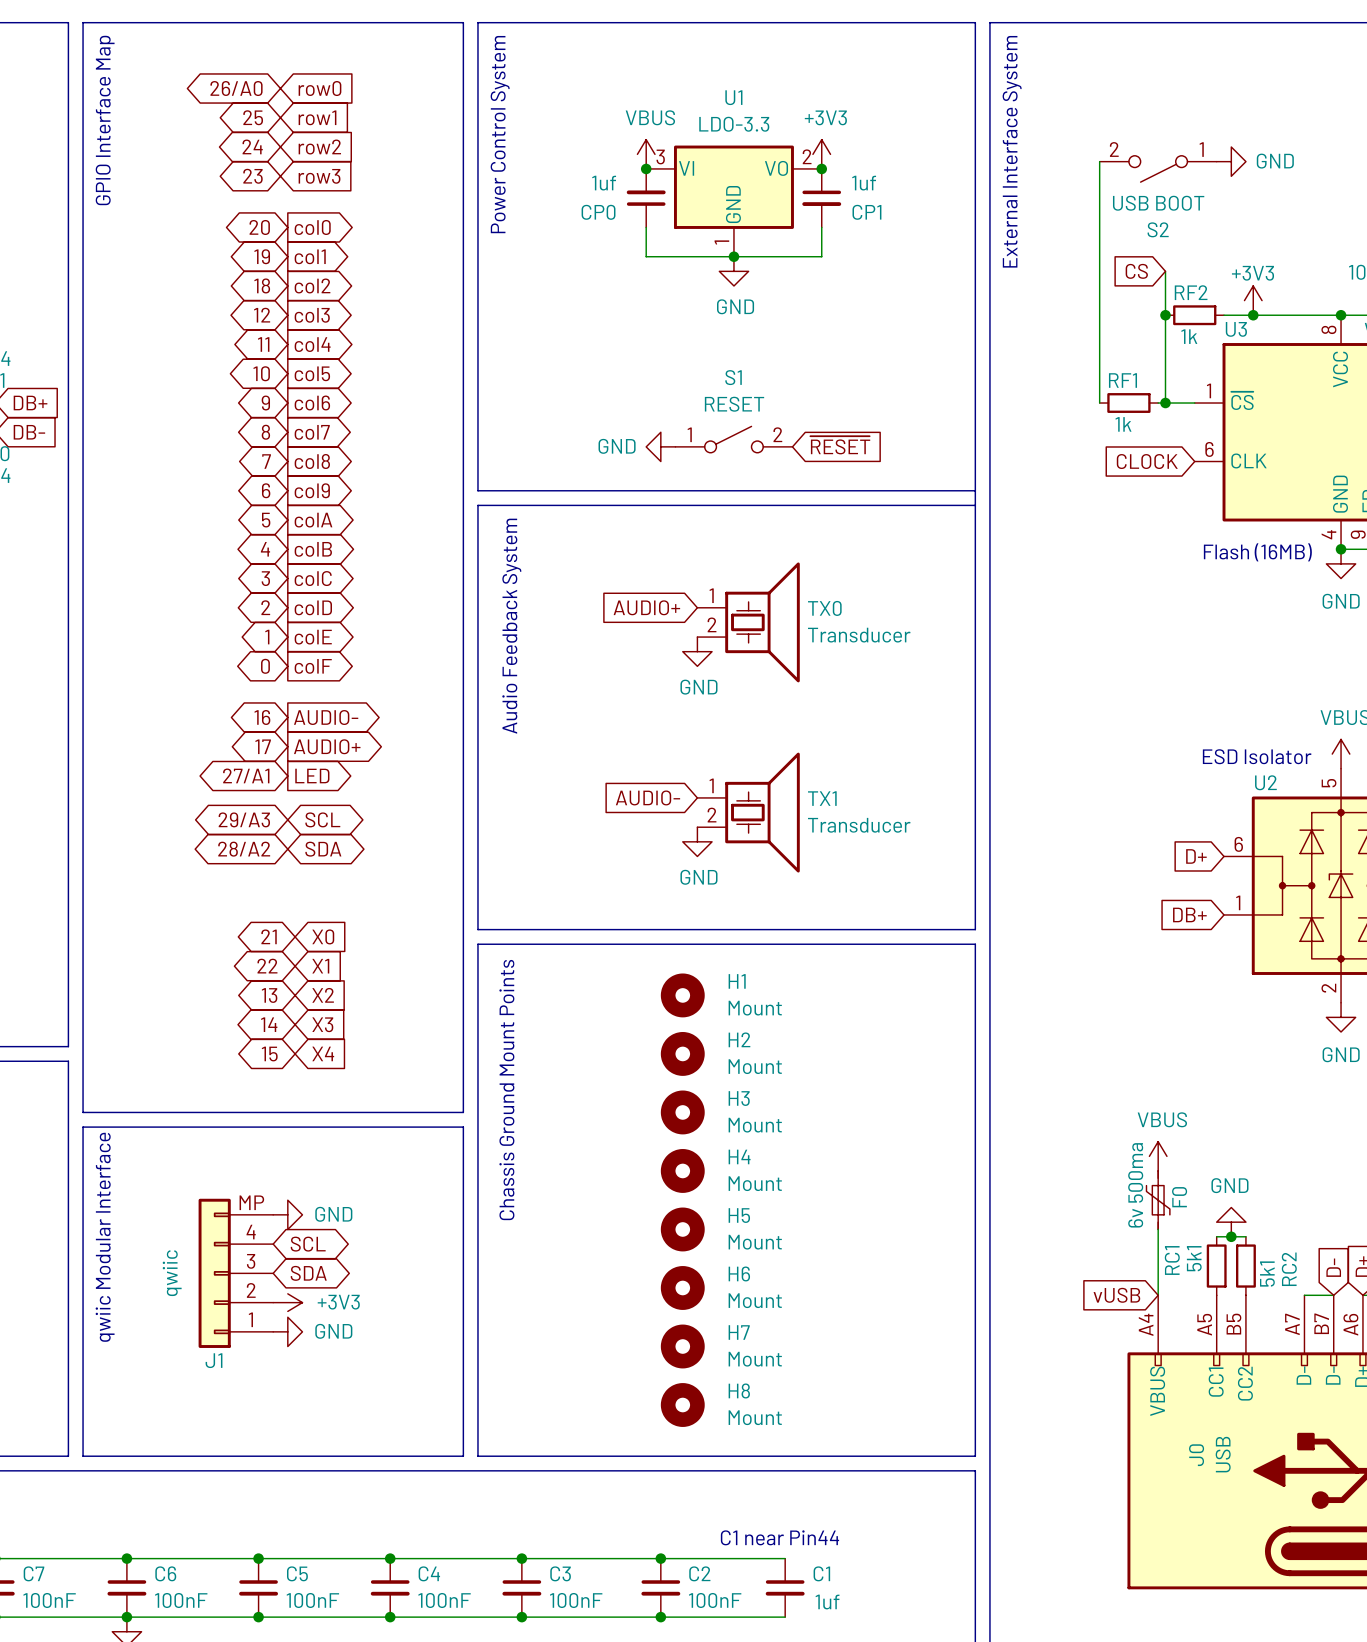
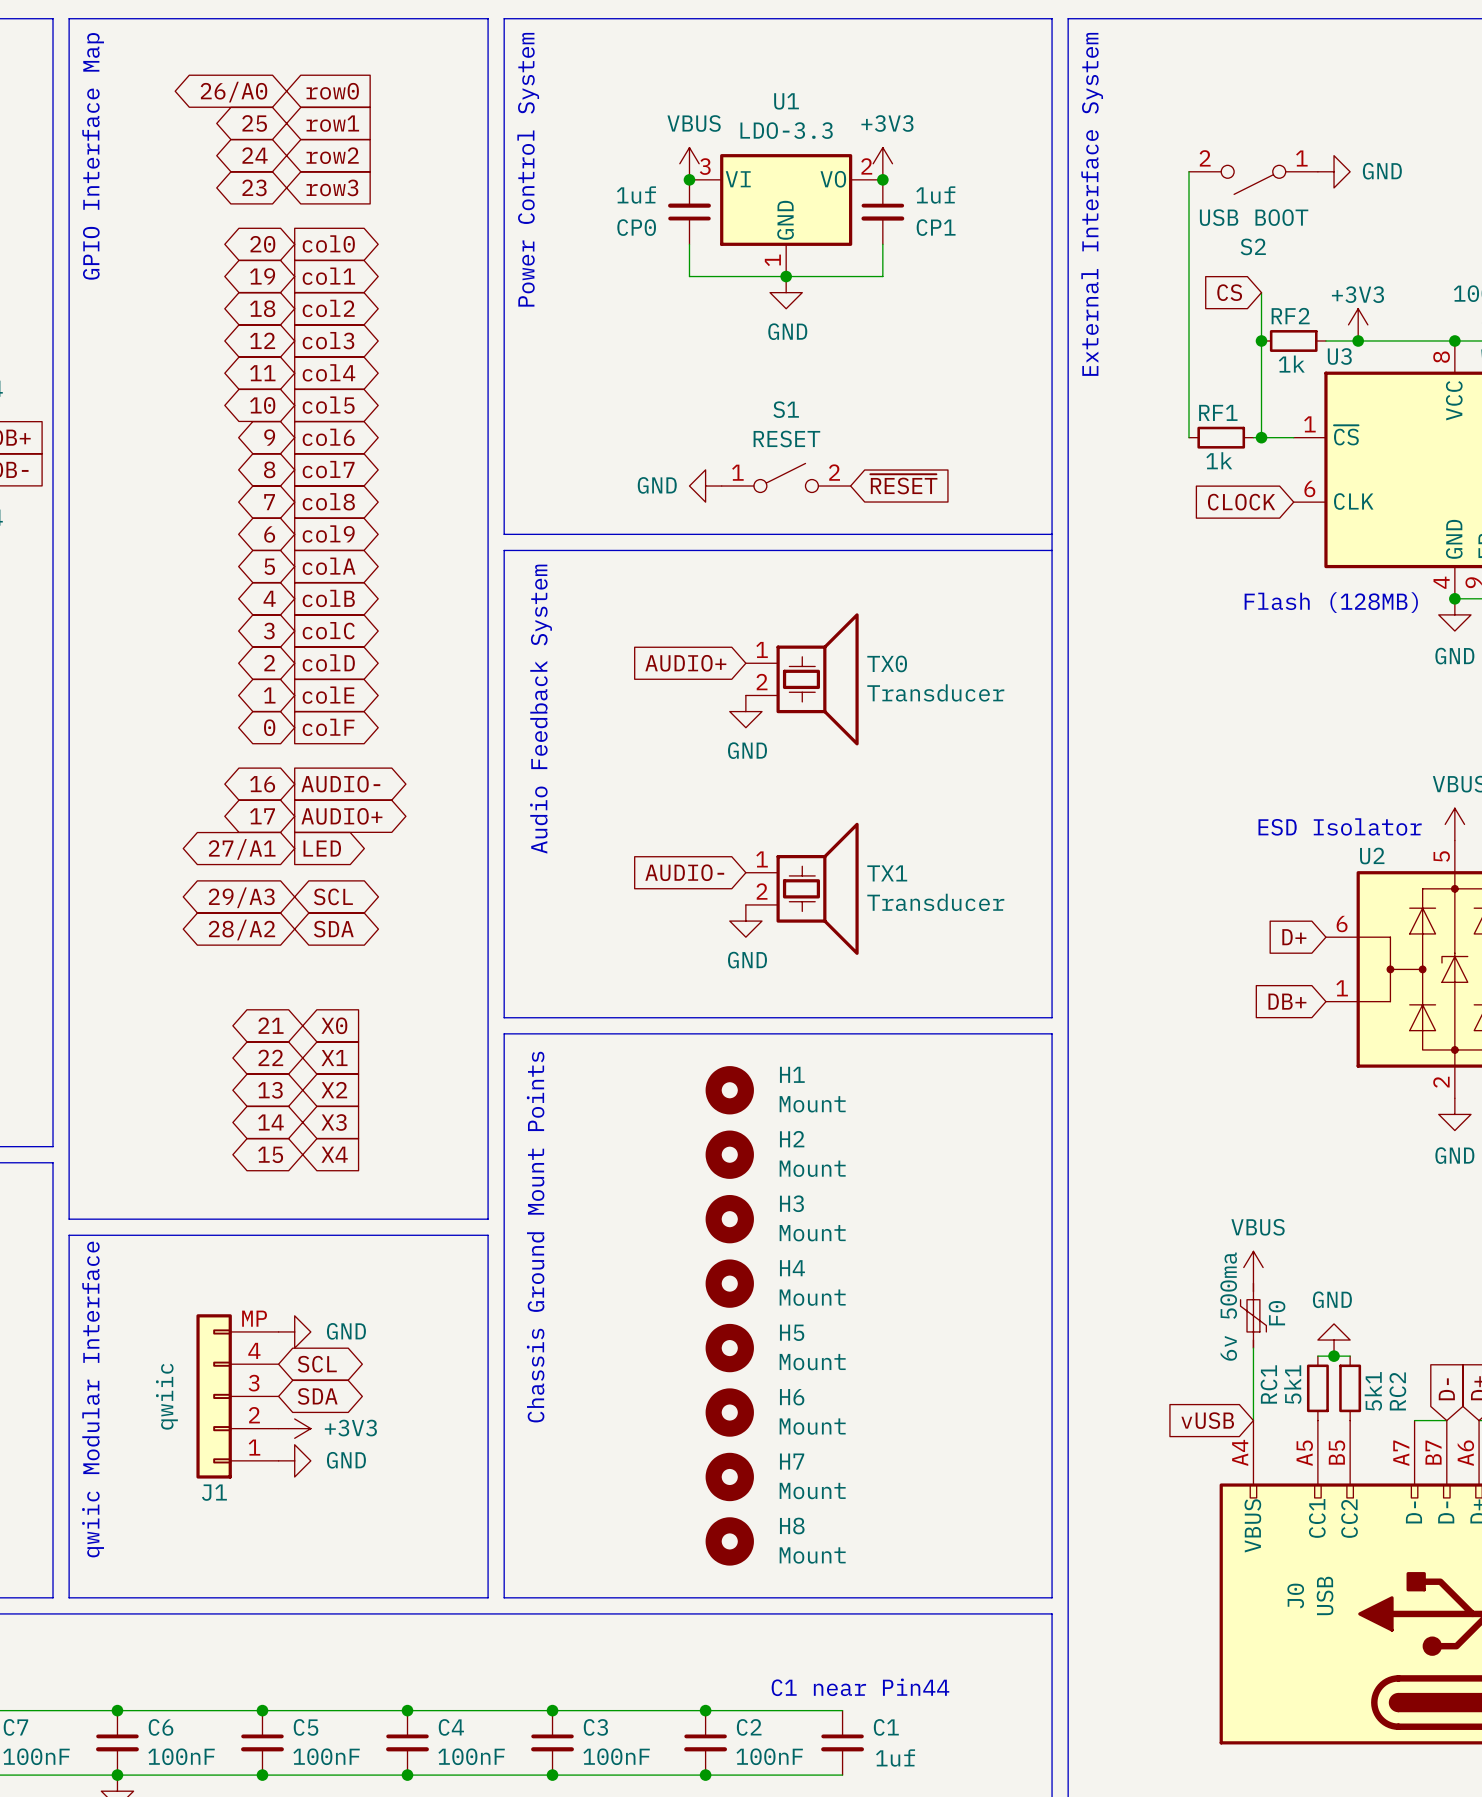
text: Flash (16MB) (1257, 552) -> Flash (128MB) (1331, 602)

